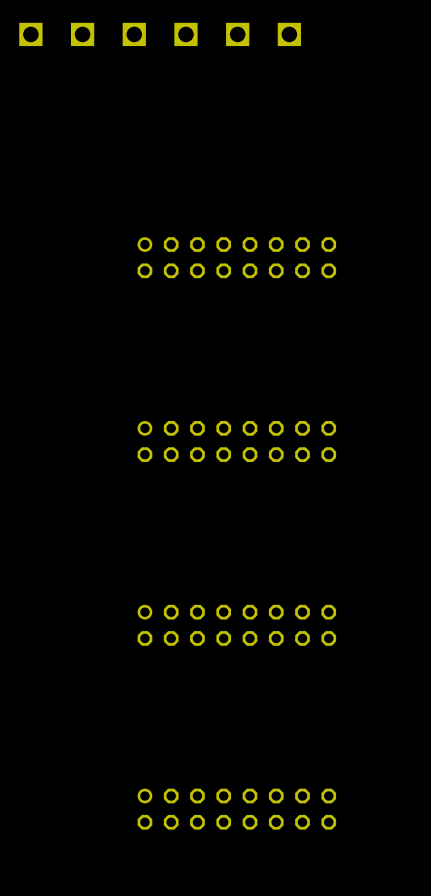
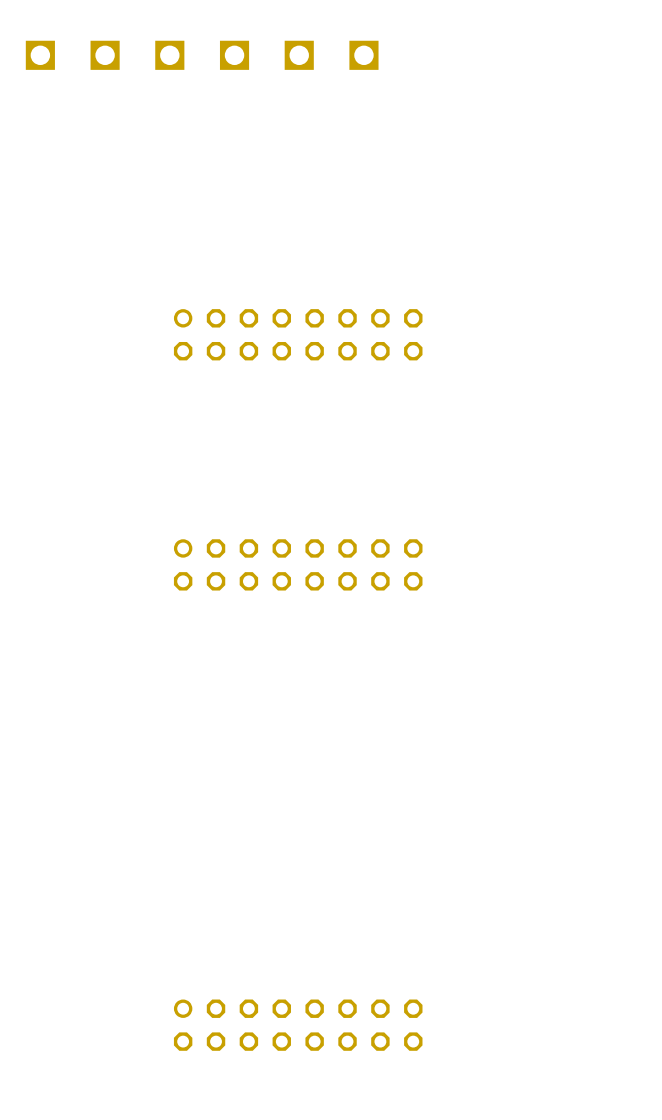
part: (236, 625) -> none

